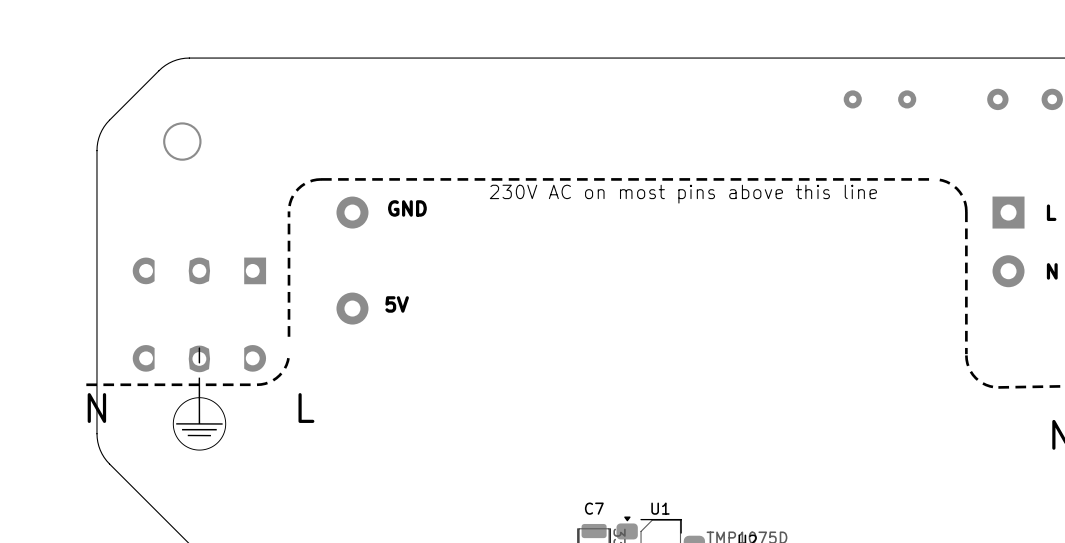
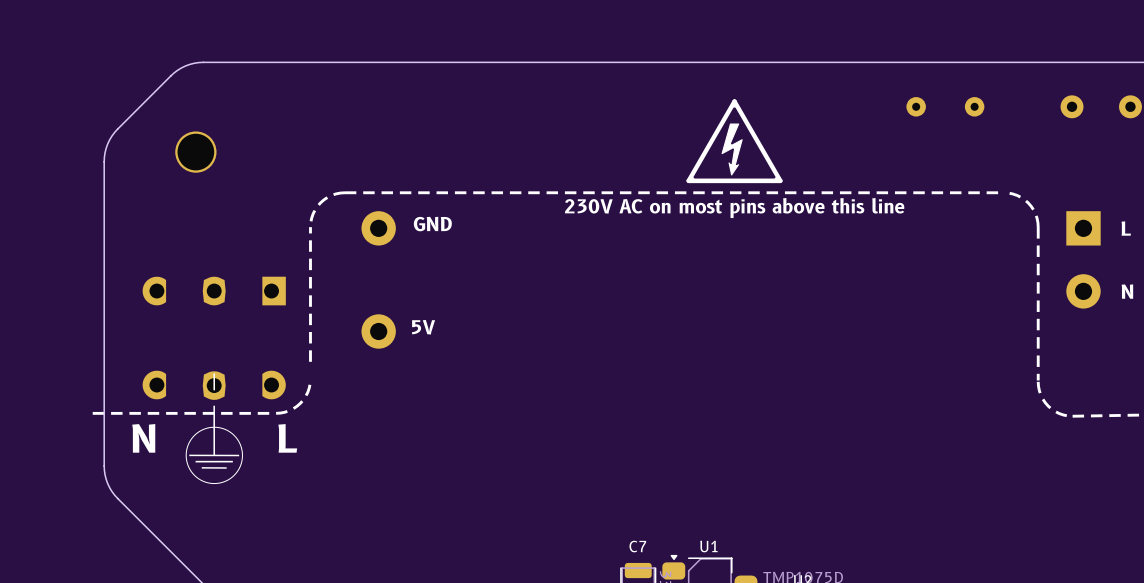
drawing: none -> [686, 99, 783, 184]

